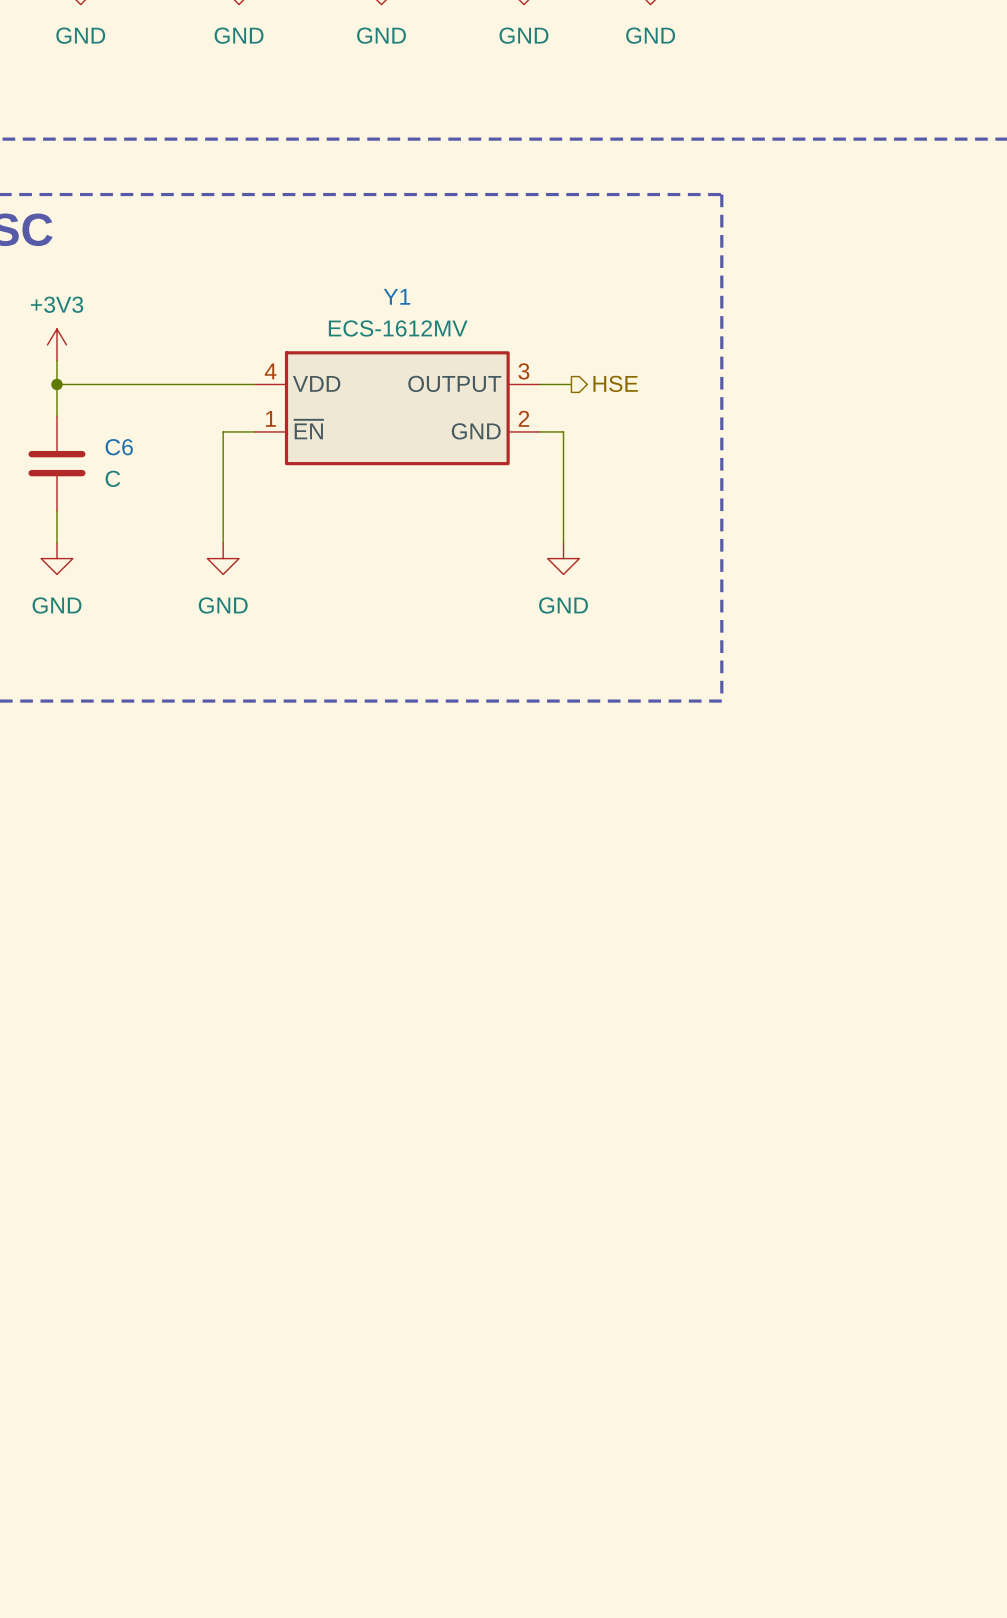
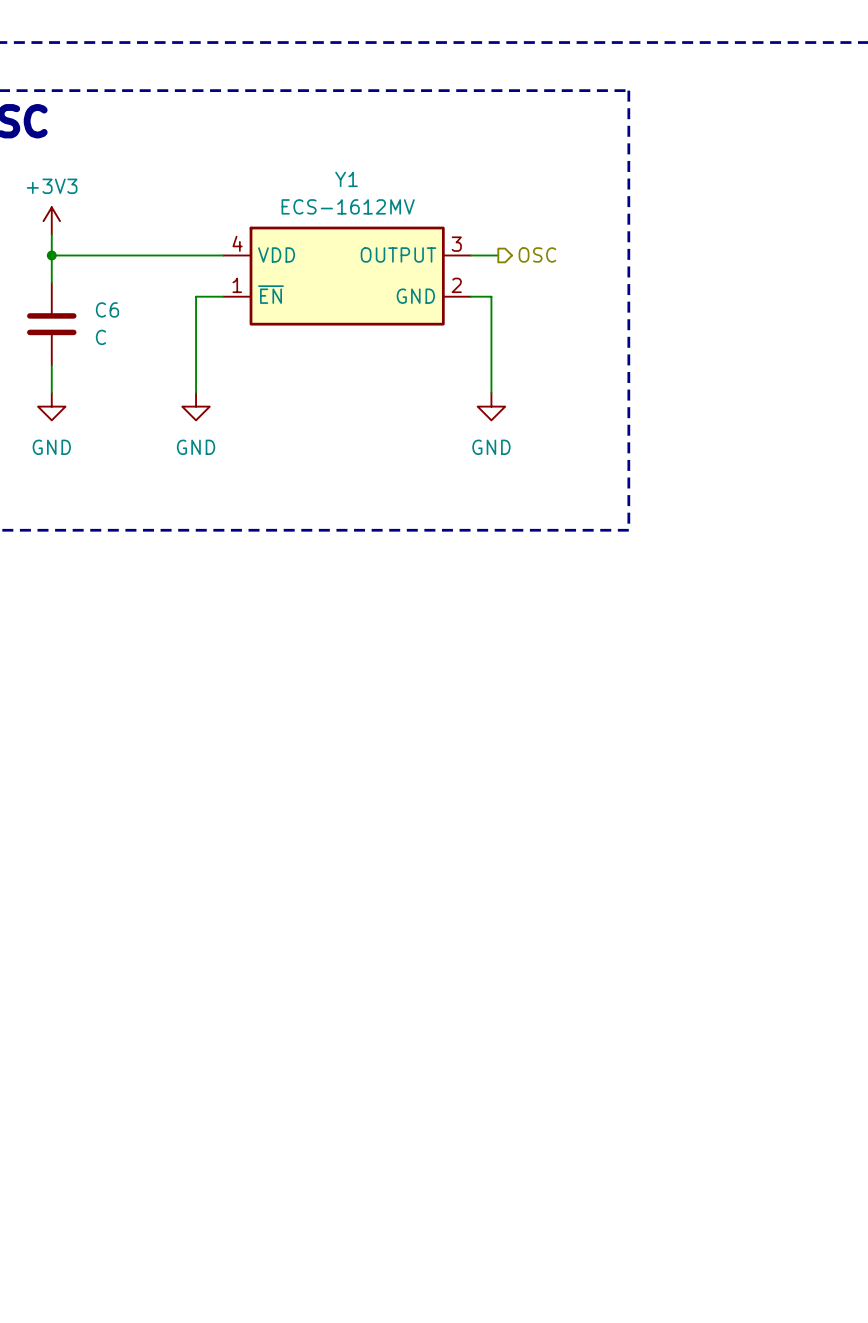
hierarchical label: HSE (615, 383) -> OSC (537, 254)

